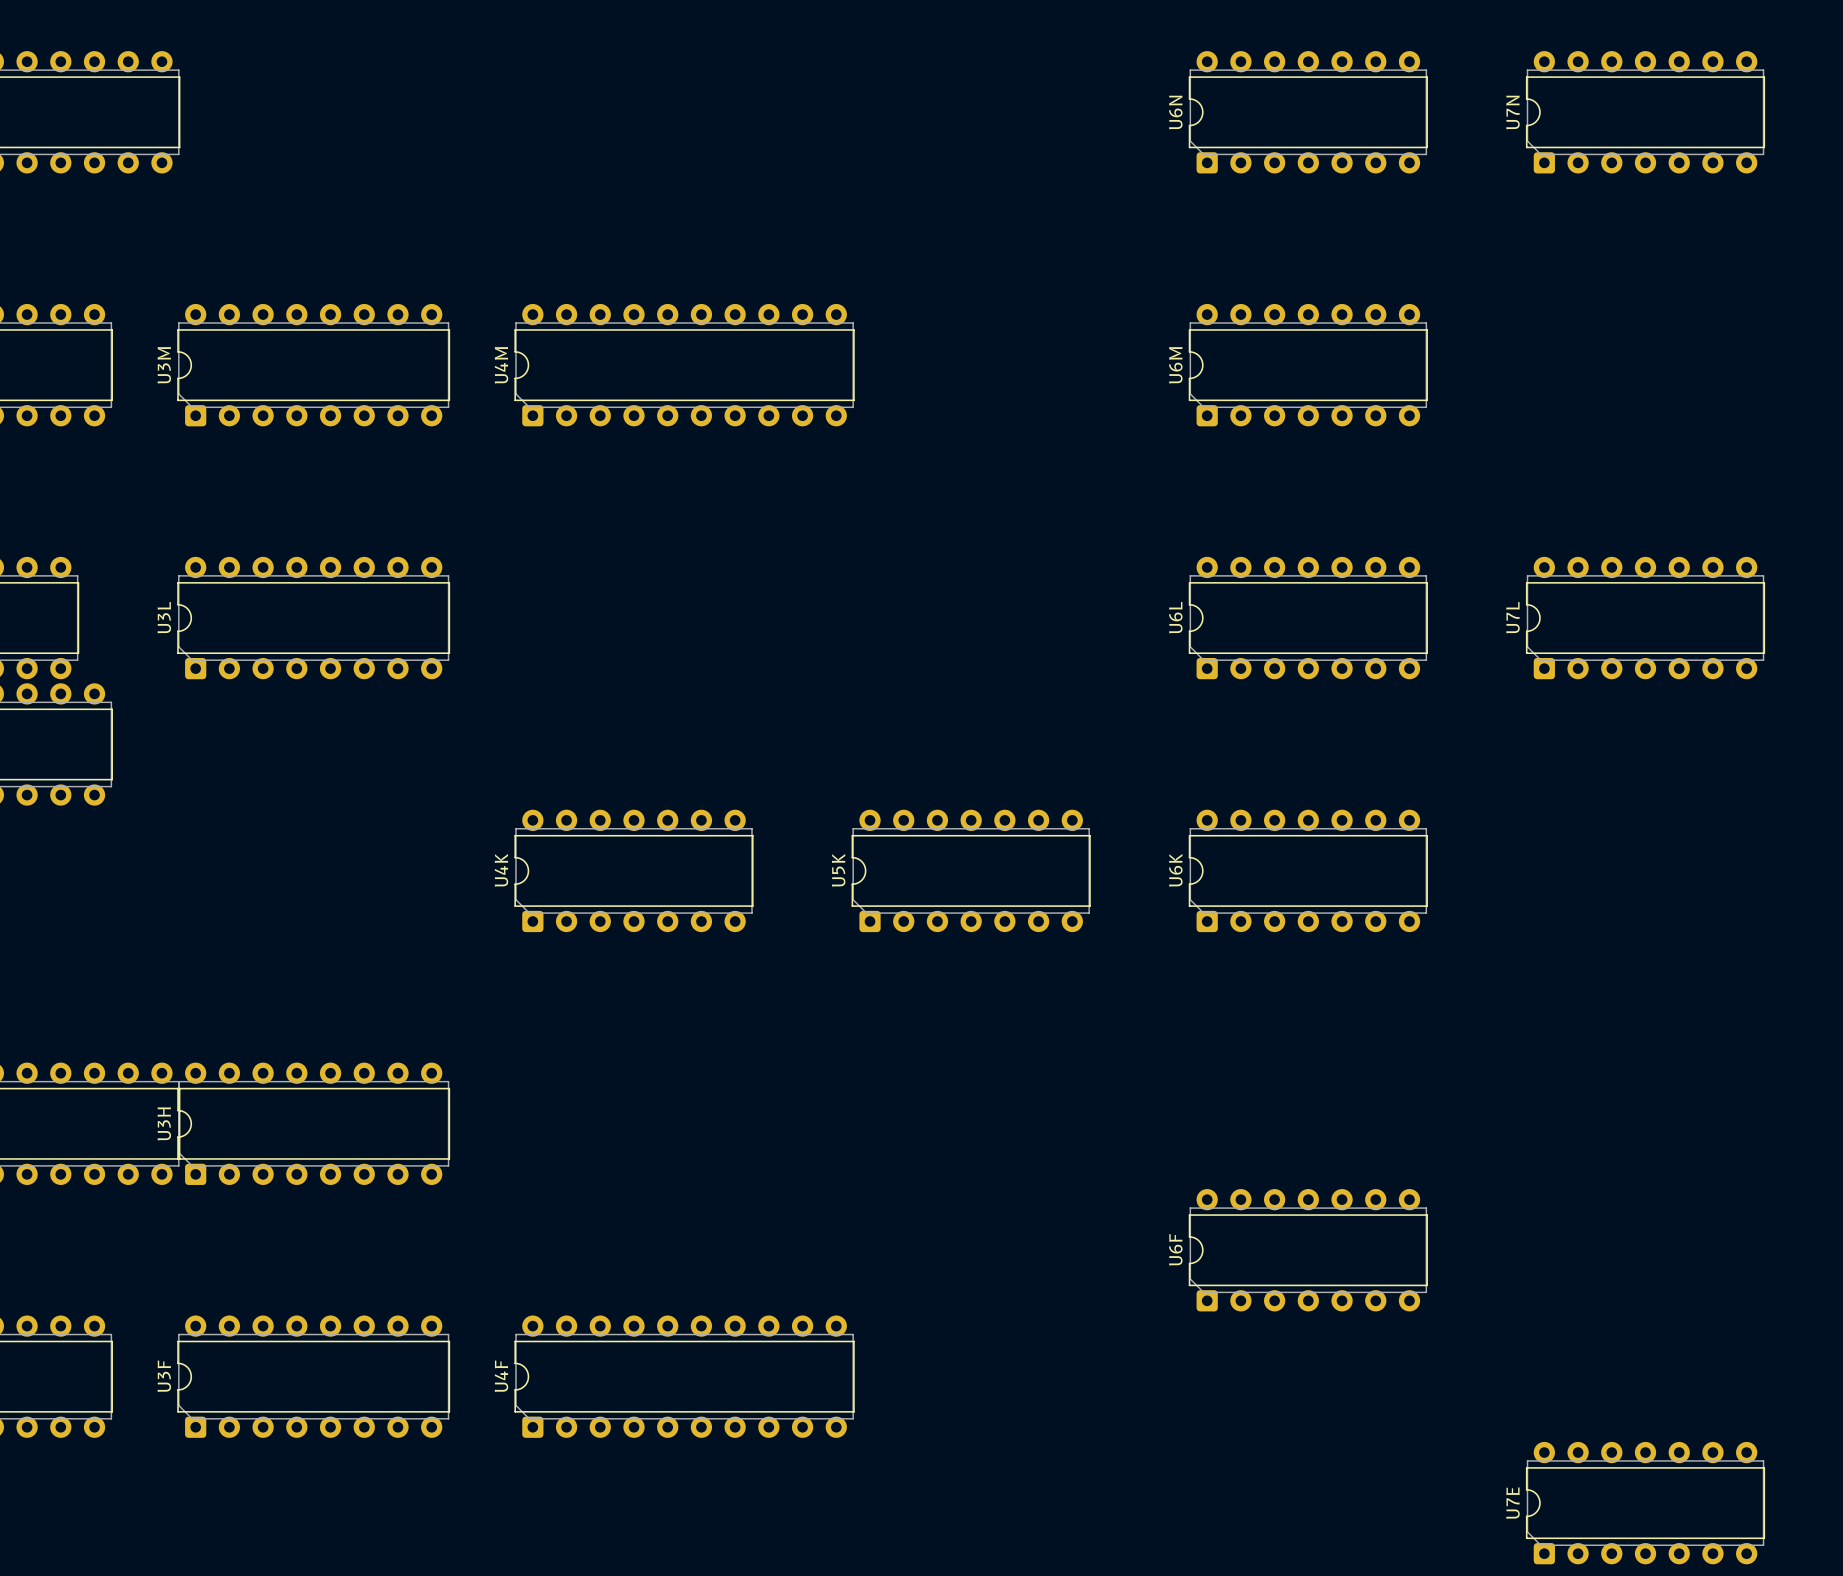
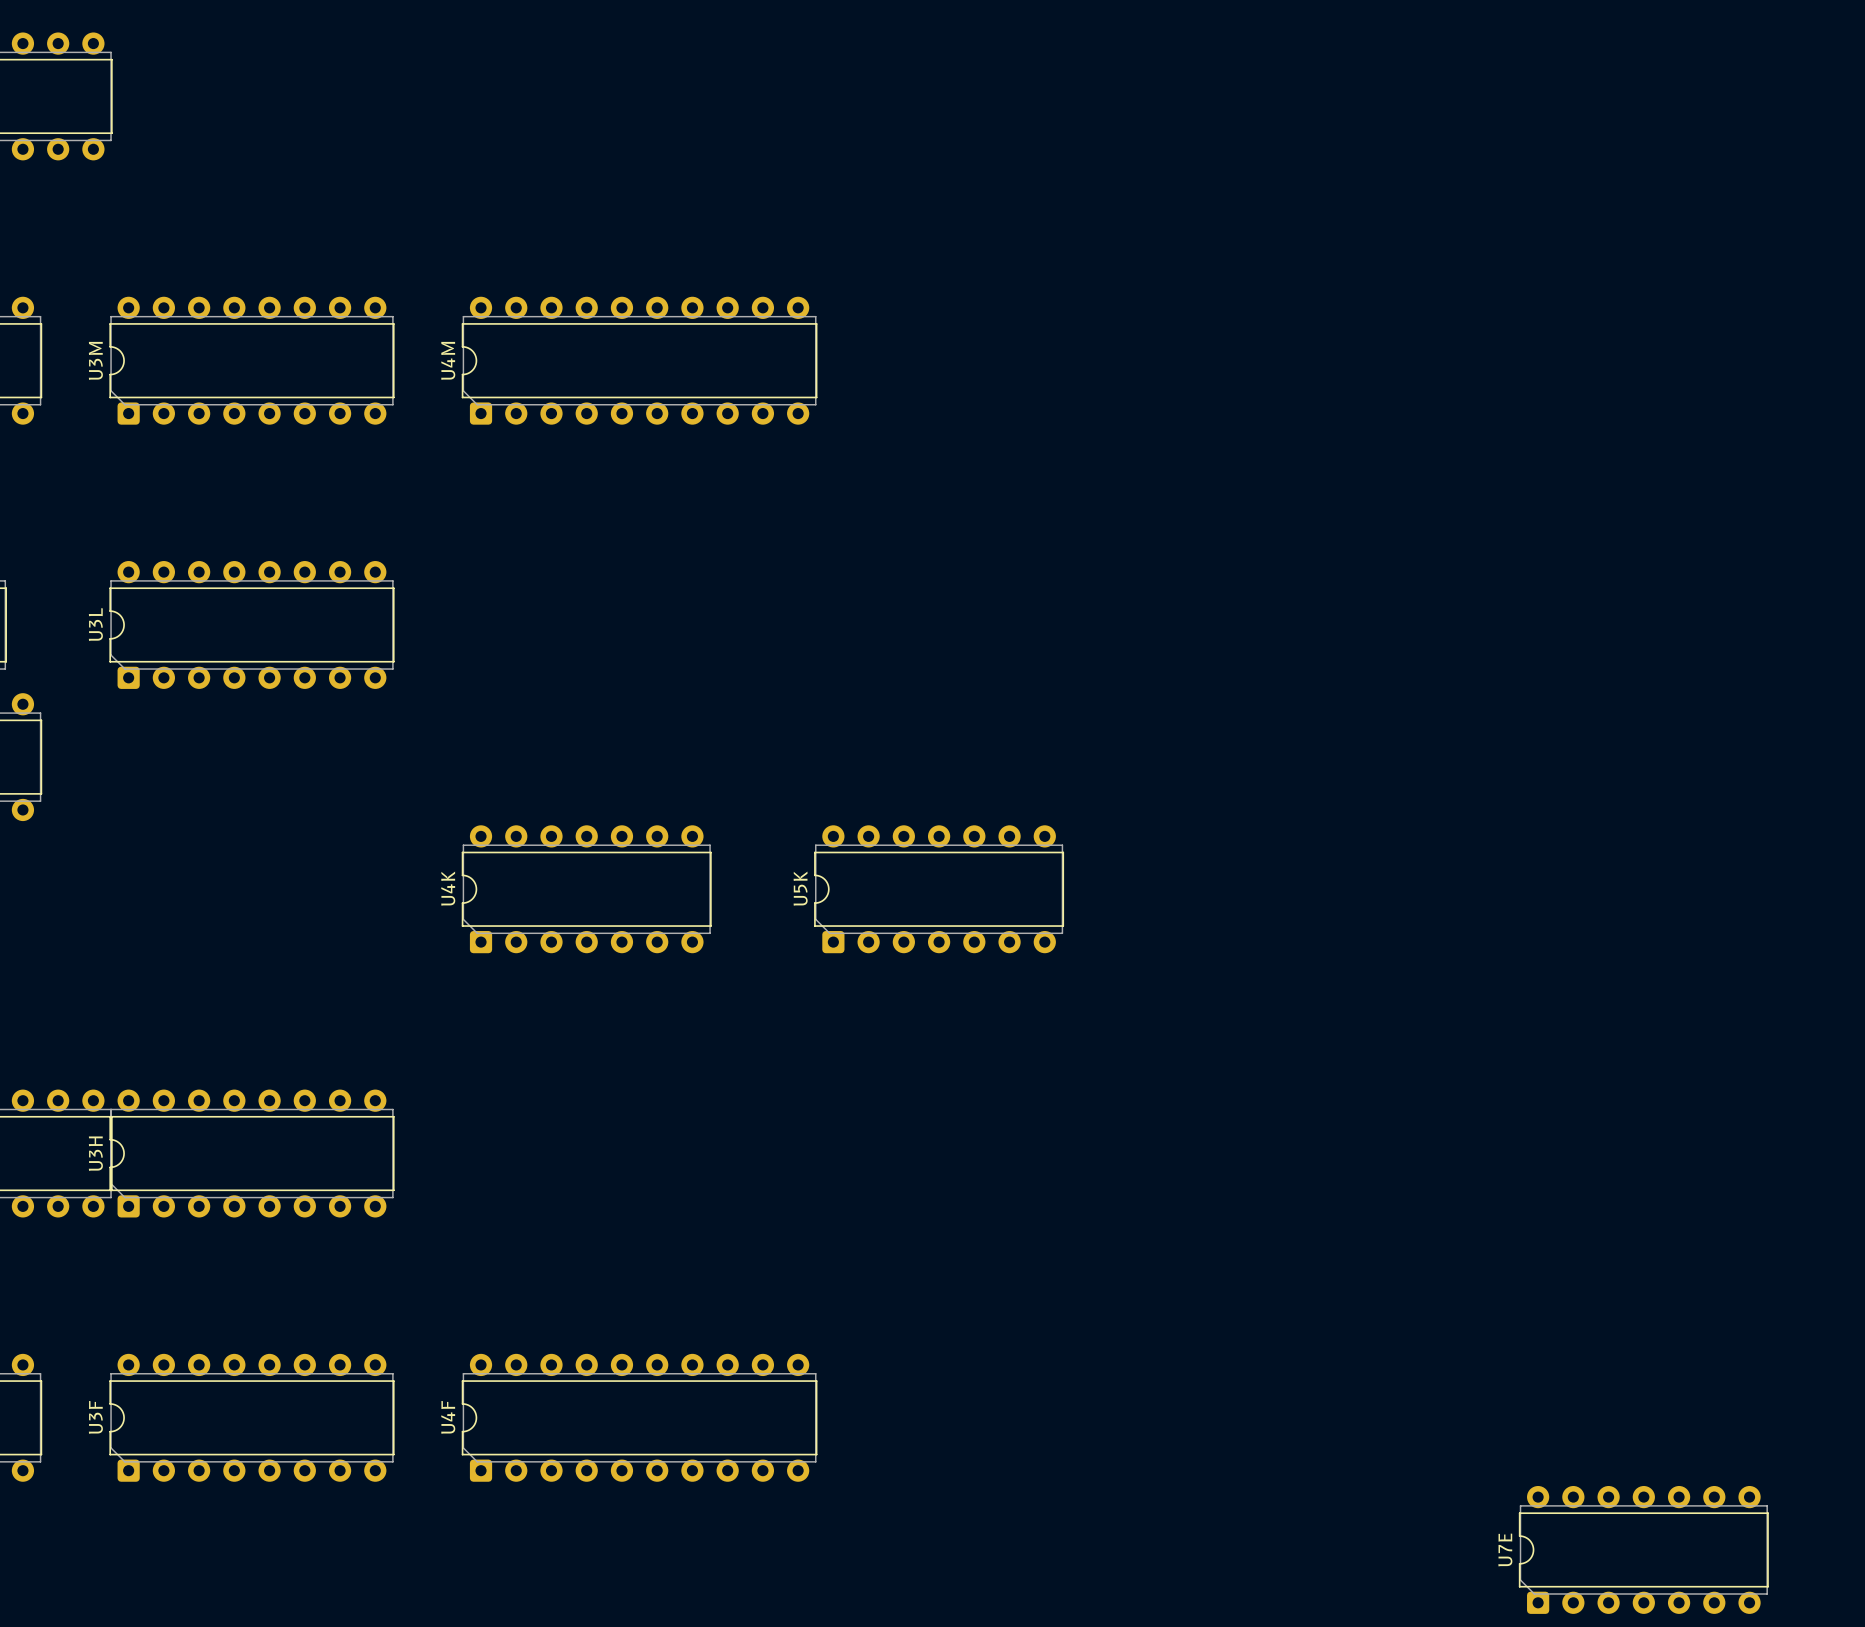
U6N: (1308, 112) -> none
U7N: (1645, 112) -> none
U6M: (1308, 365) -> none
U6L: (1308, 618) -> none
U7L: (1645, 618) -> none
U6K: (1308, 870) -> none
U6F: (1308, 1250) -> none

